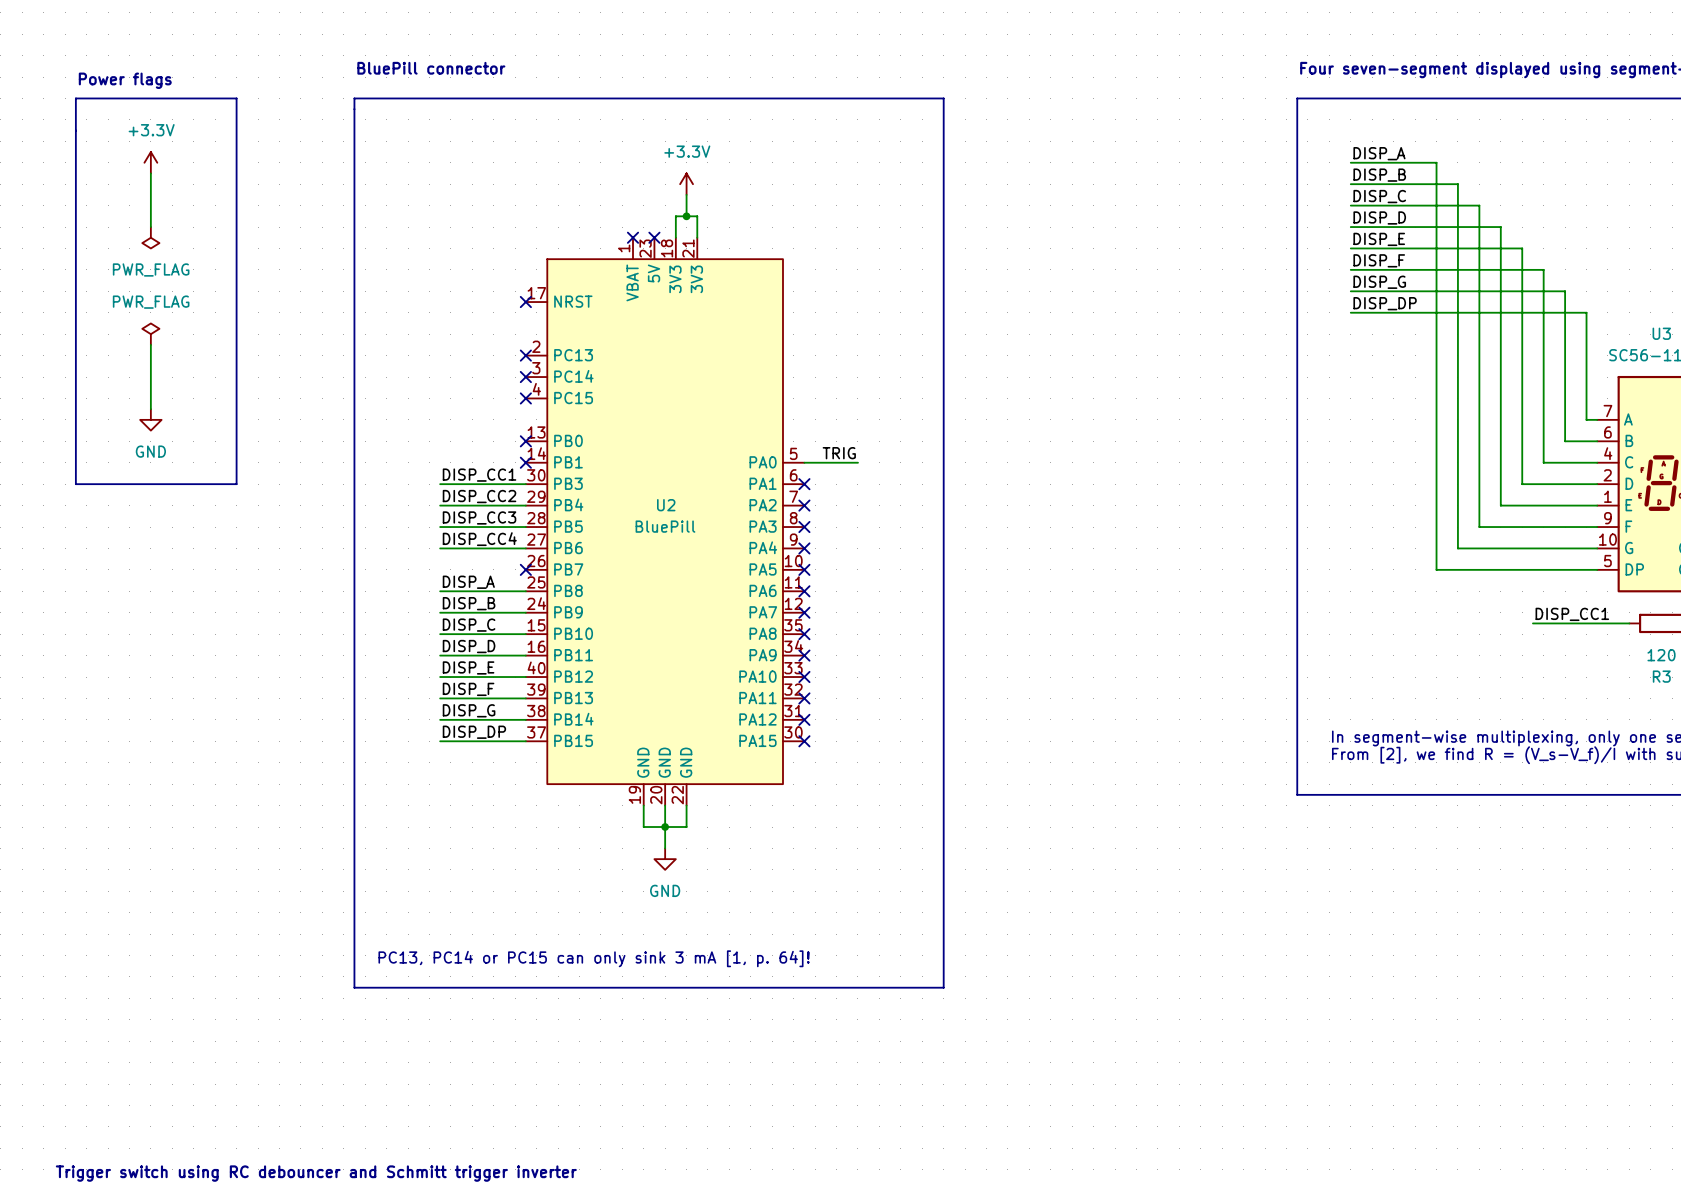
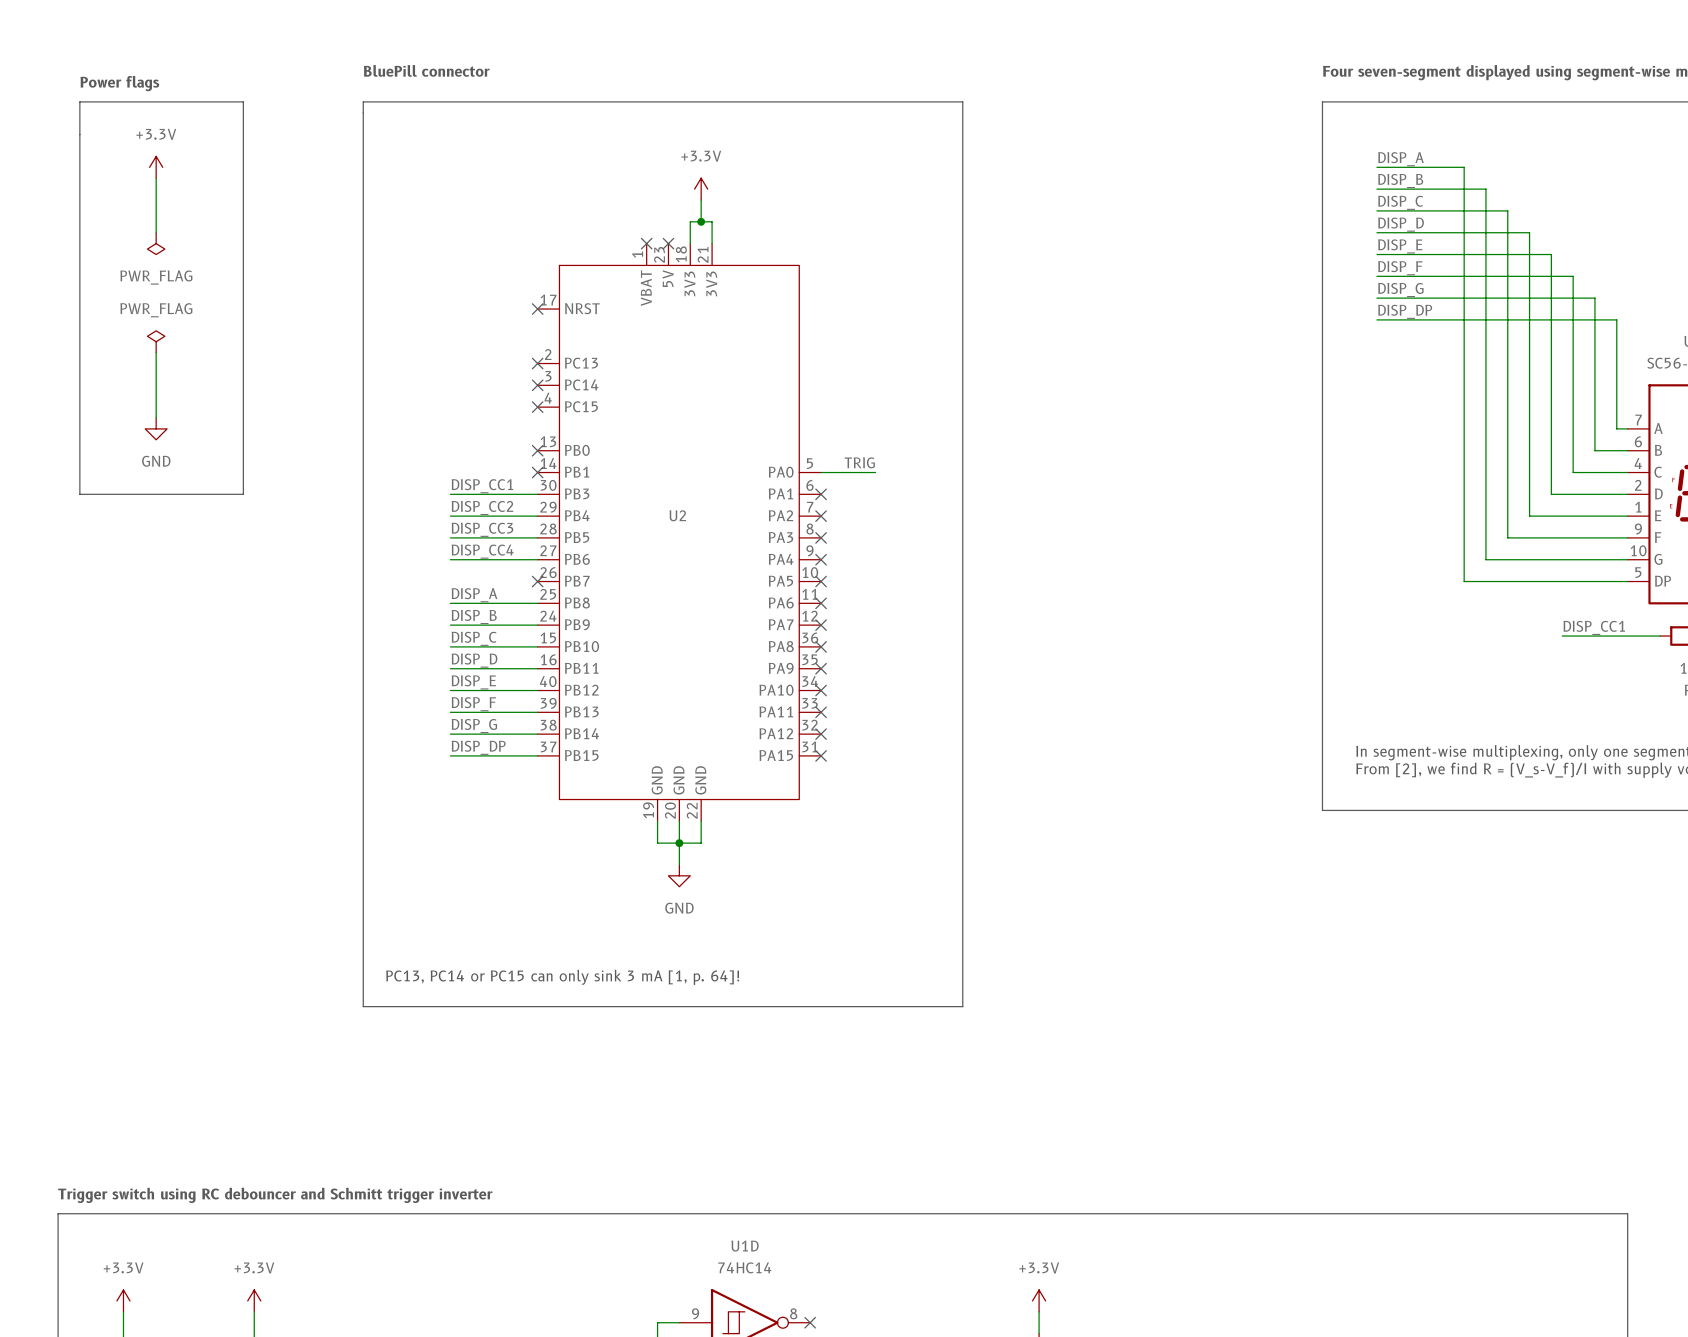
U2 value: BluePill (665, 526) -> none
U2 pin number: 35 (793, 625) -> 36 (810, 638)
U2 pin number: 34 (793, 646) -> 35 (809, 659)
U2 pin number: 33 (793, 668) -> 34 (810, 681)
U2 pin number: 32 (793, 689) -> 33 (810, 703)
U2 pin number: 31 (793, 711) -> 32 (810, 725)
U2 pin number: 30 (793, 732) -> 31 (809, 746)

